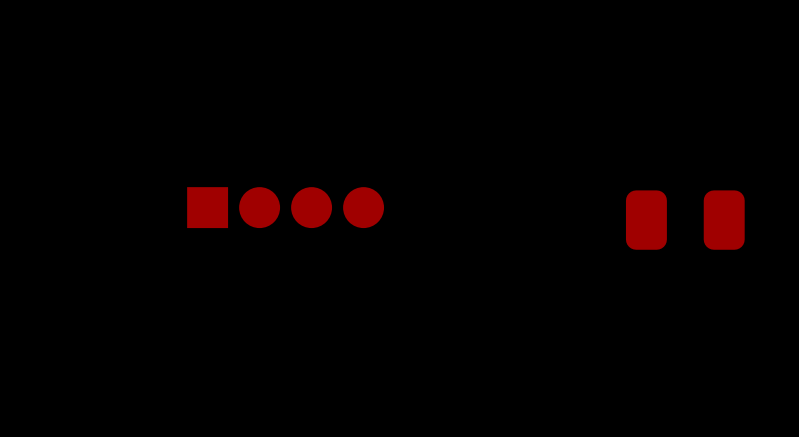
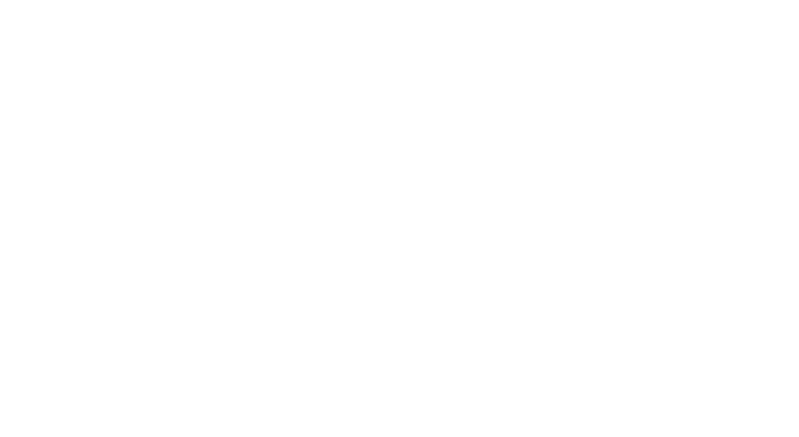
part: (285, 207) -> none
part: (685, 220) -> none

